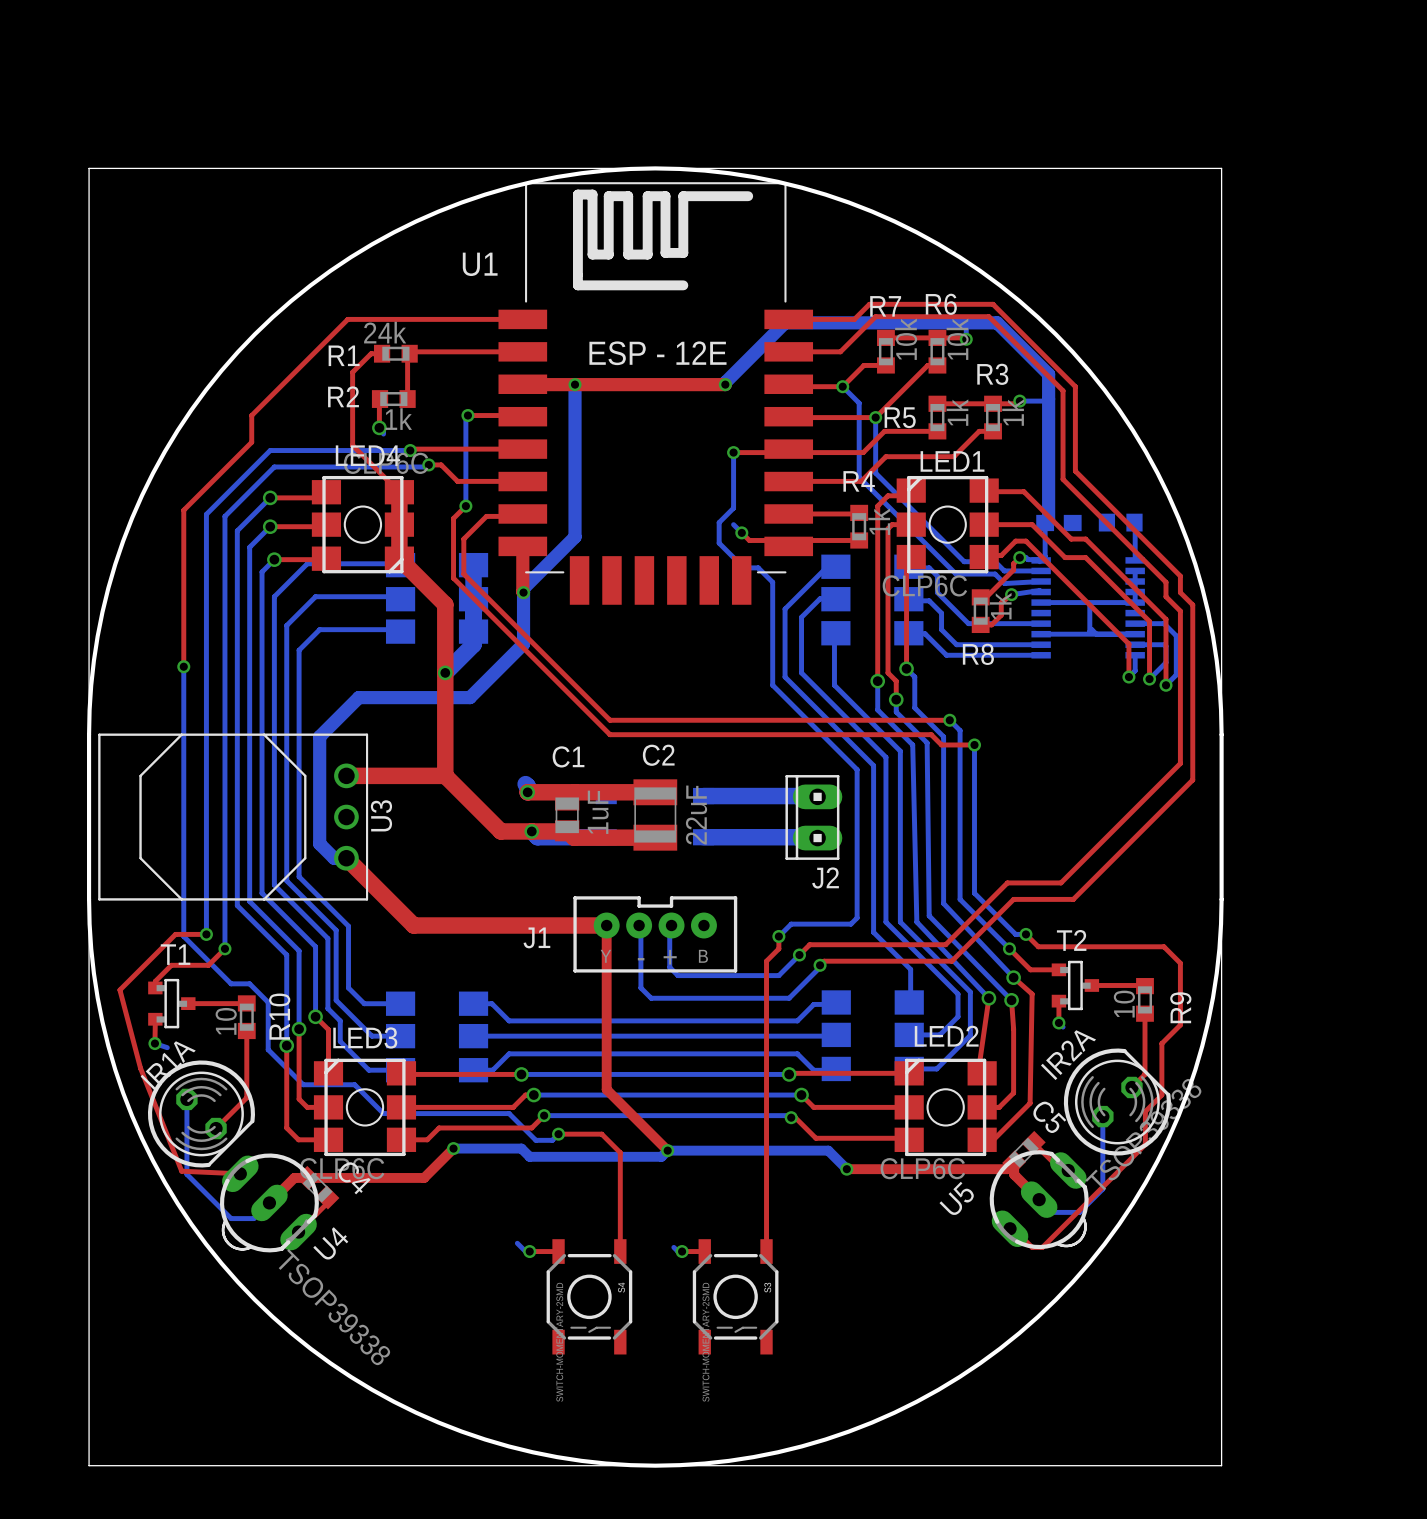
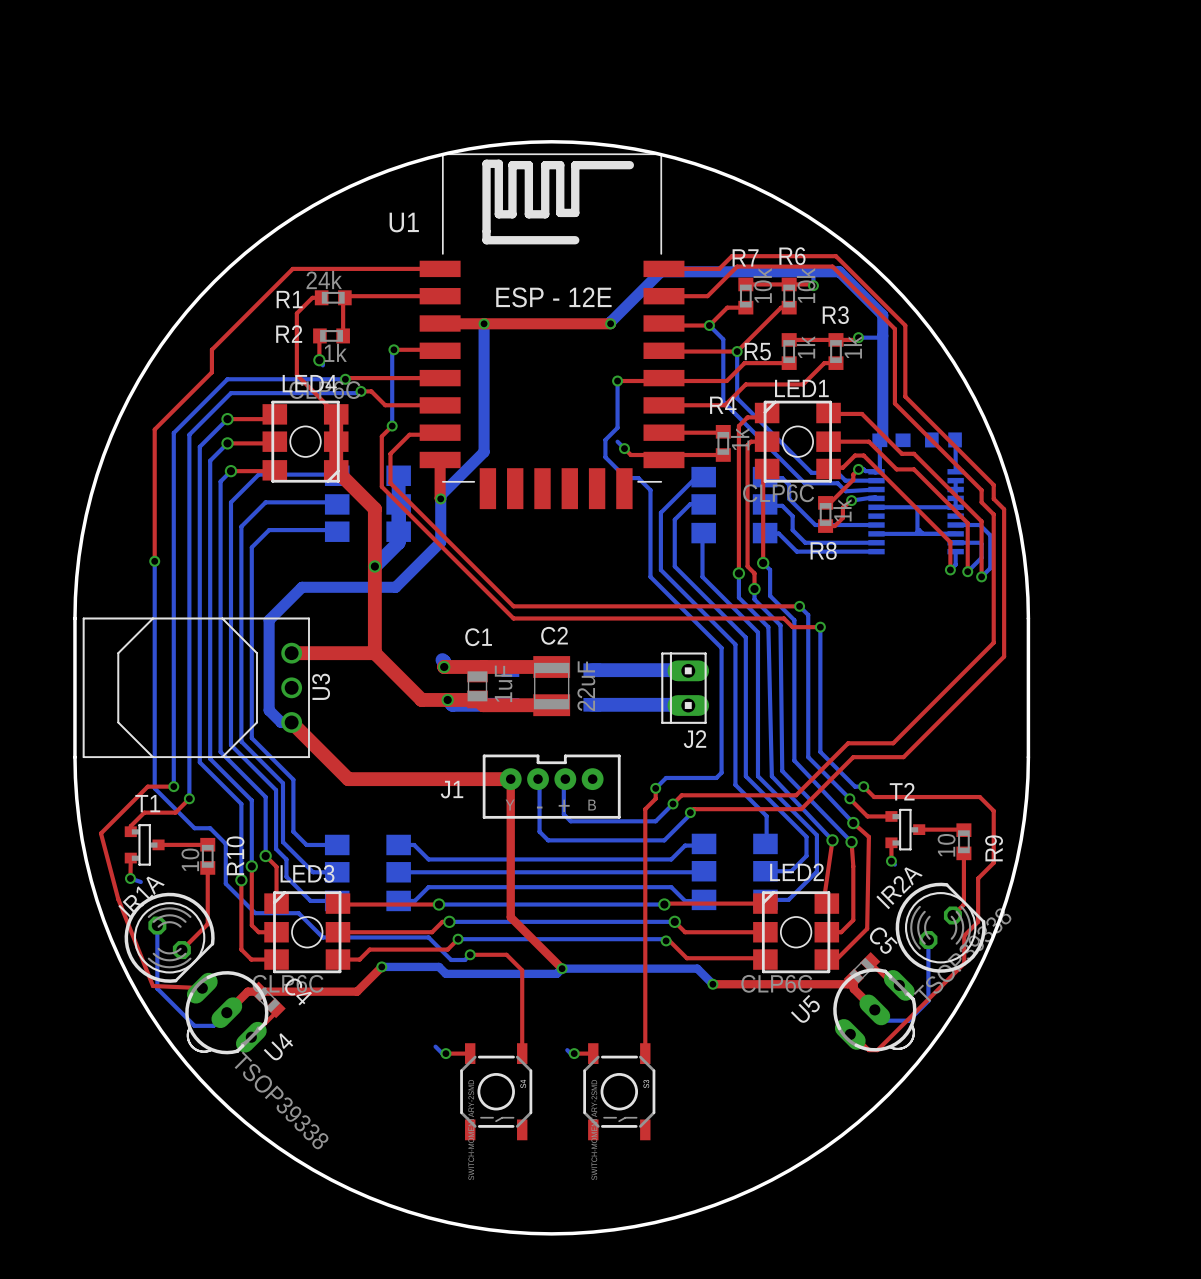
board edge: (89, 734) (89, 168) (1221, 168) (1221, 734) -> none
board edge: (89, 899) (89, 1465) (1221, 1465) (1221, 899) -> none

